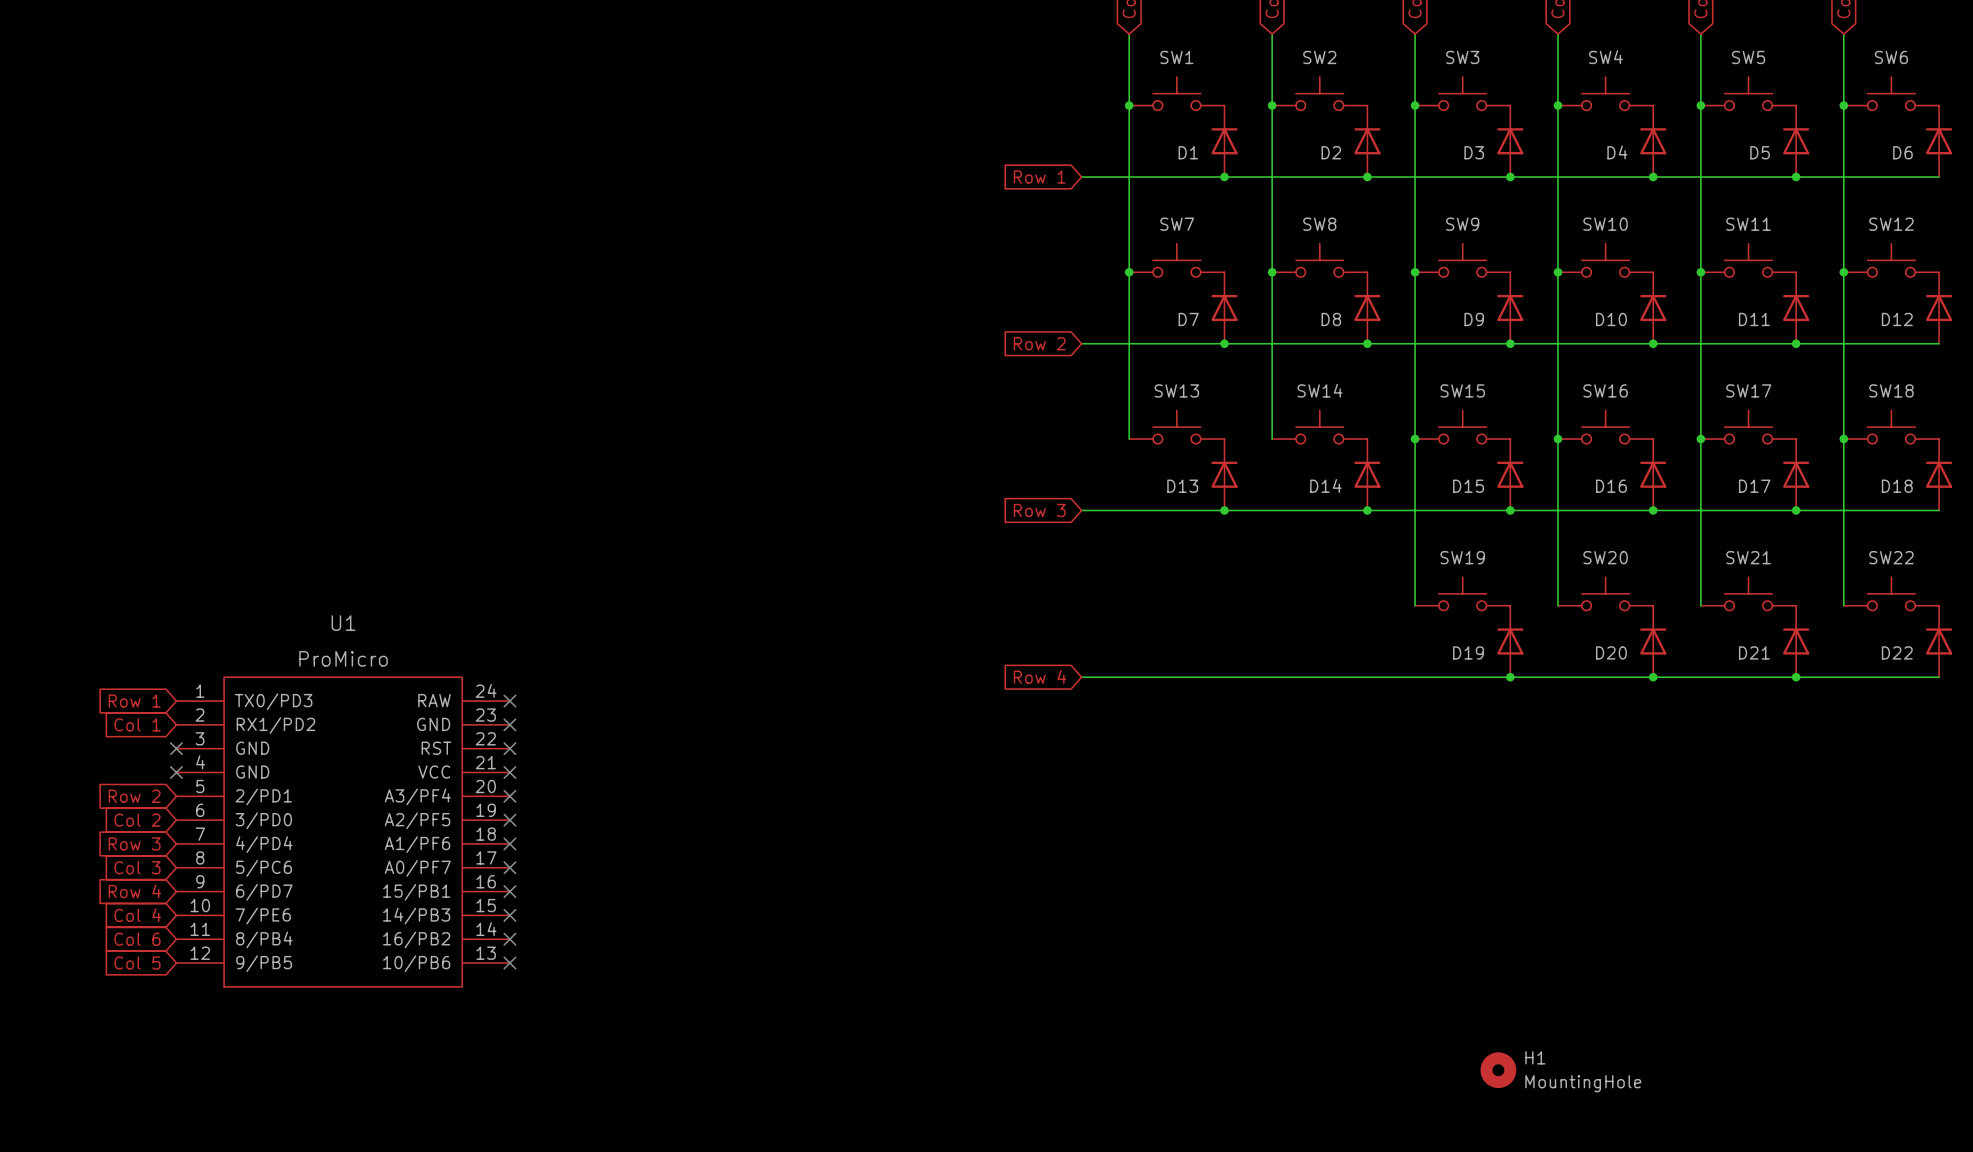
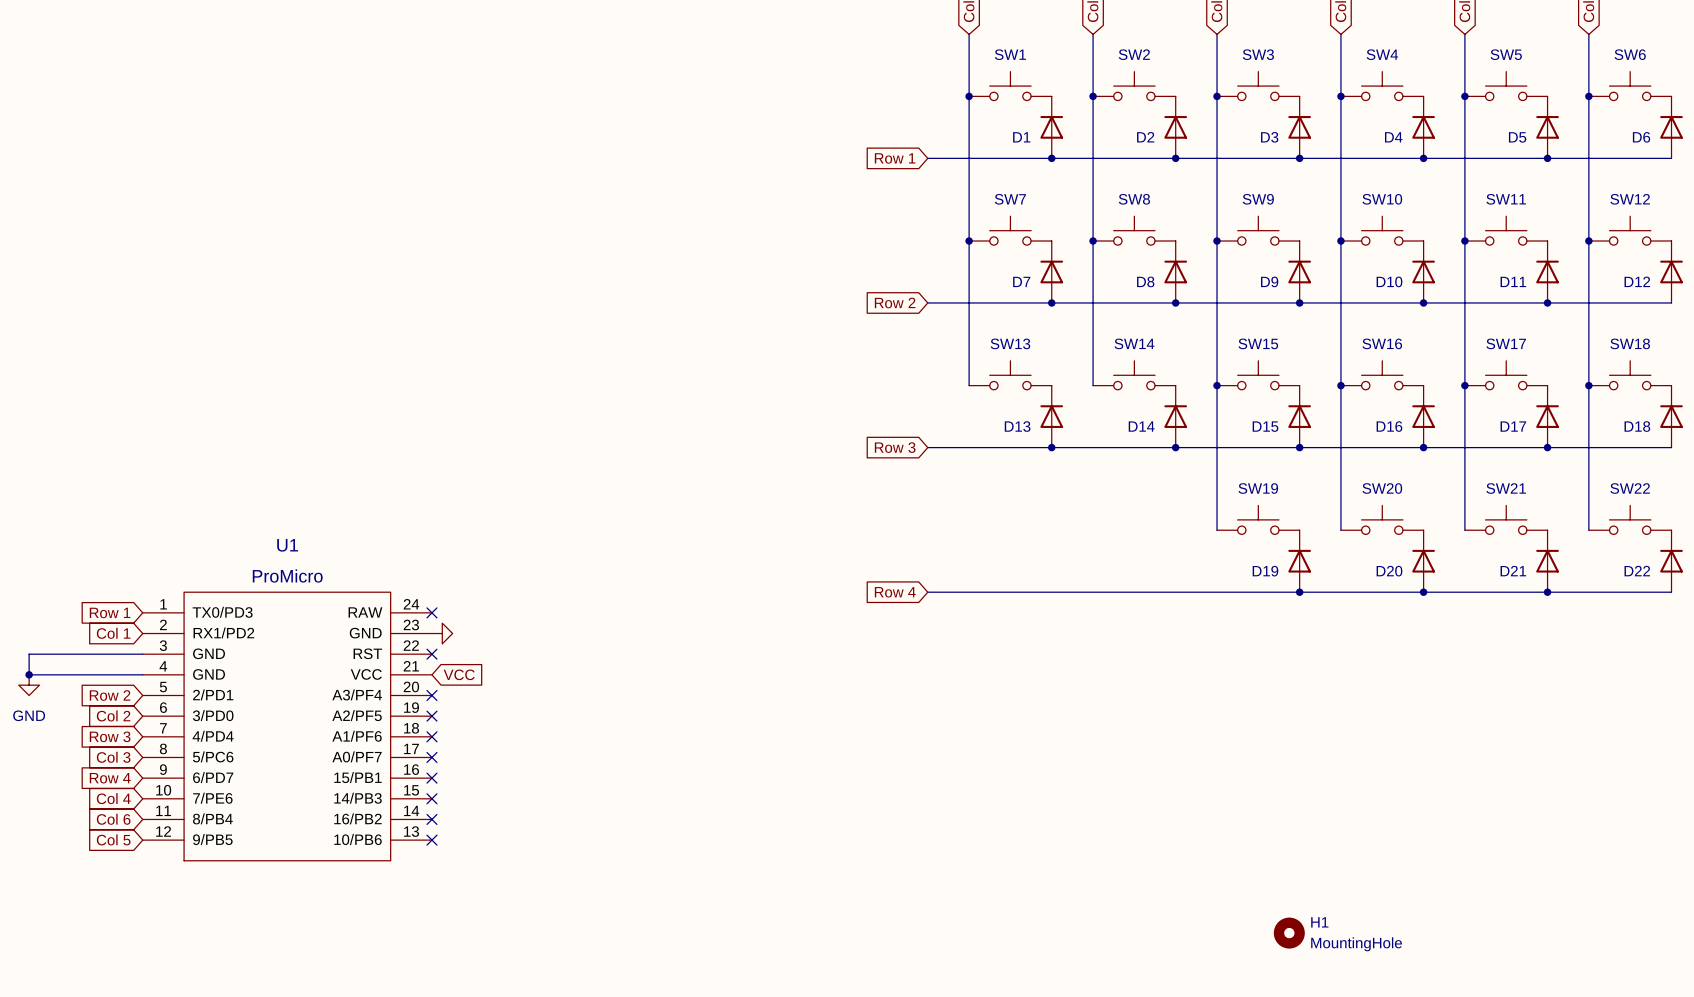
no-connect mark: (509, 724) -> none
power symbol: none -> (442, 633)
wire: none -> (142, 654) (29, 654) (29, 674) (142, 674)
no-connect mark: (176, 748) -> none
junction: none -> (29, 674)
no-connect mark: (176, 772) -> none
no-connect mark: (509, 772) -> none
global label: none -> VCC (459, 674)
power symbol: none -> GND (29, 685)

